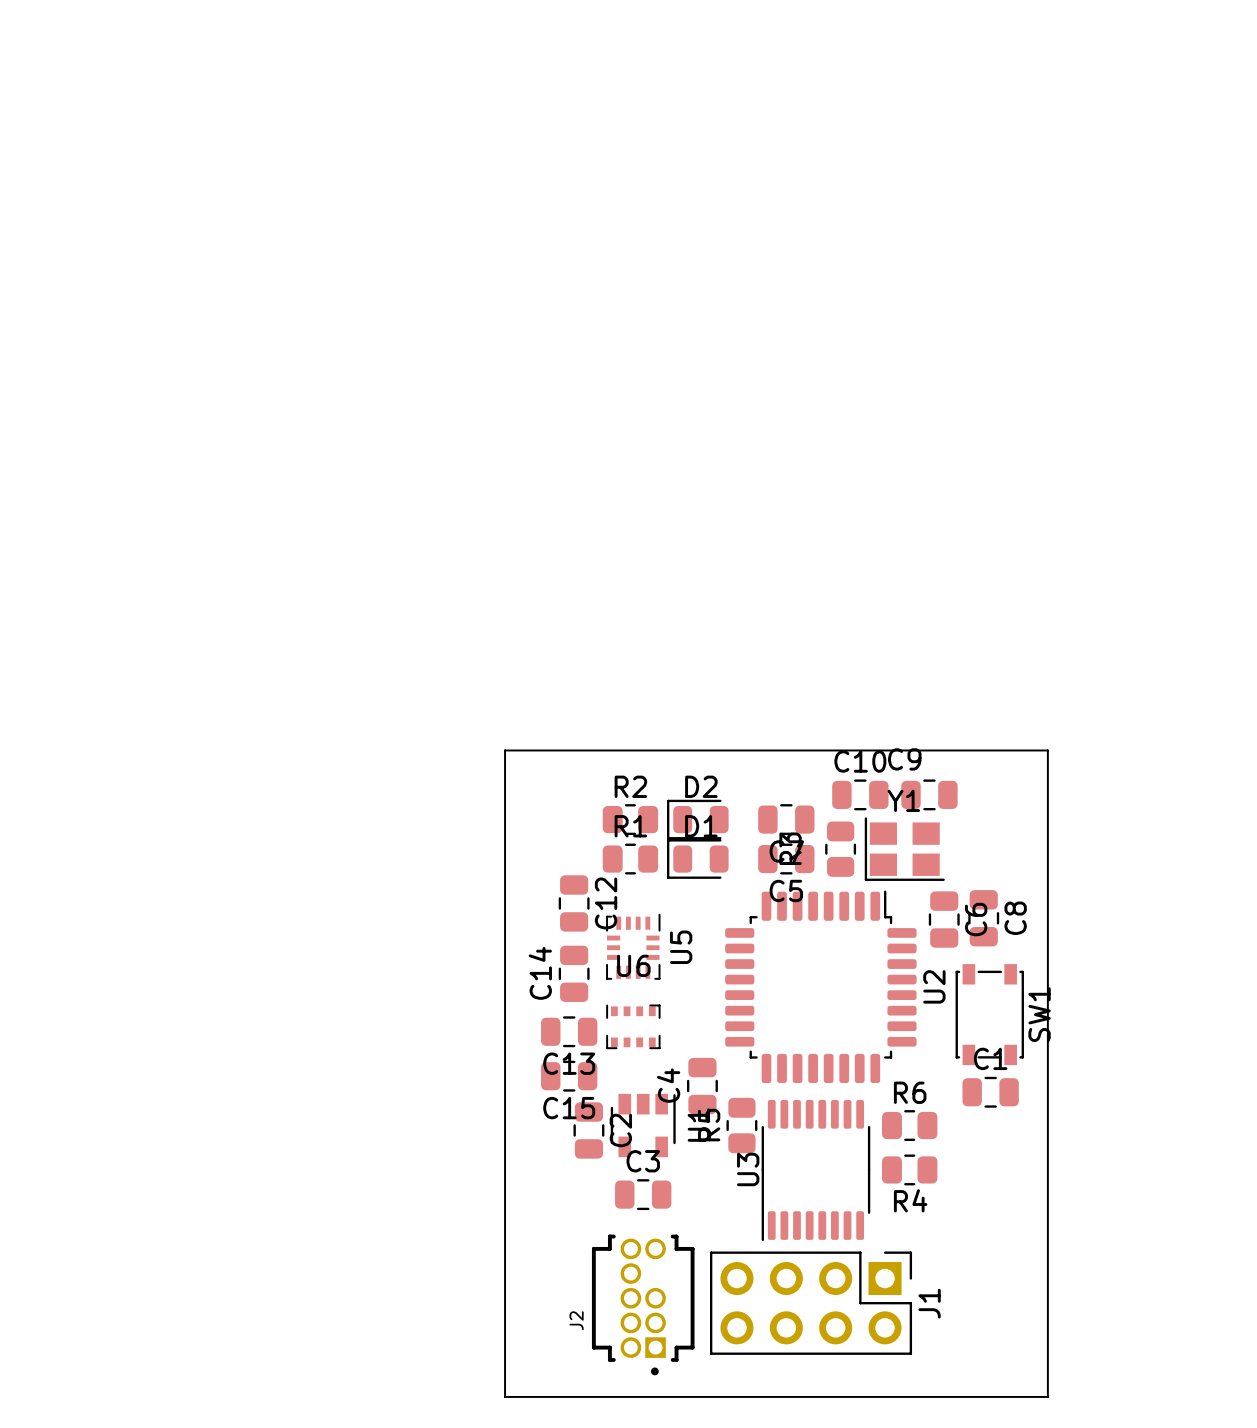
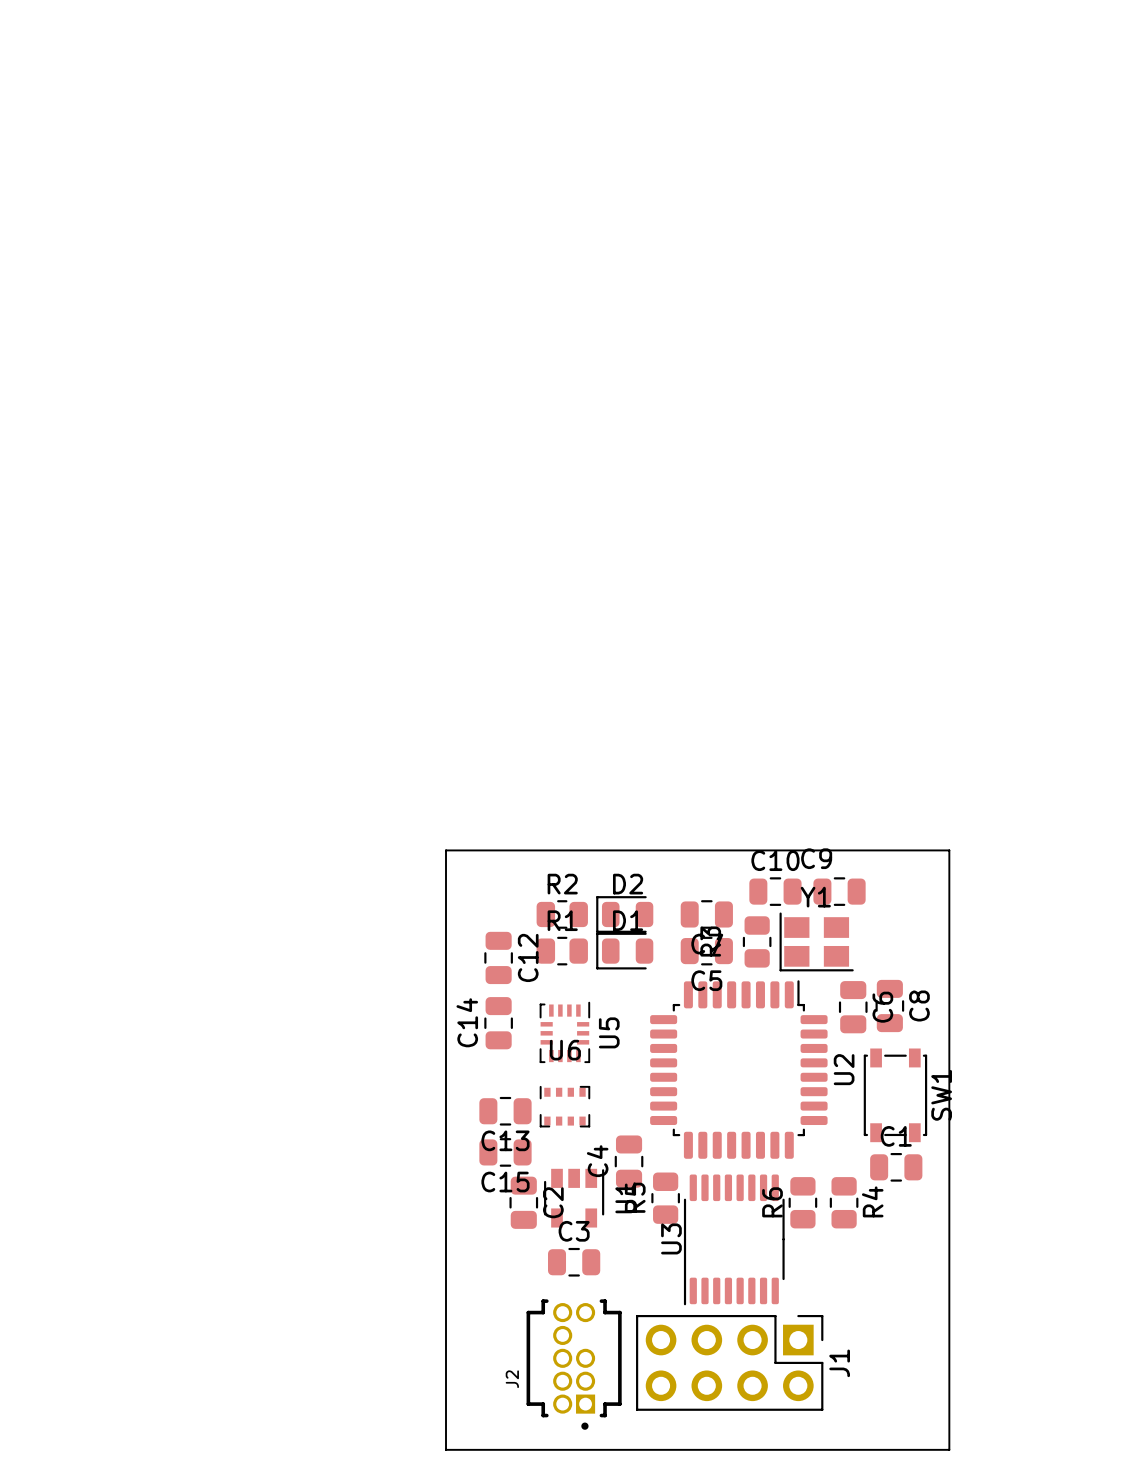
C12 position: (574, 903) -> (498, 957)
C14 position: (574, 973) -> (498, 1023)
R6 name position: R6 (910, 1092) -> R6 (772, 1202)
R6 rotation: 0° (909, 1125) -> 90° clockwise (802, 1202)
R4 rotation: 0° (909, 1169) -> 90° clockwise (844, 1202)
R4 position: (909, 1169) -> (844, 1202)
R4 name position: R4 (910, 1200) -> R4 (872, 1201)

